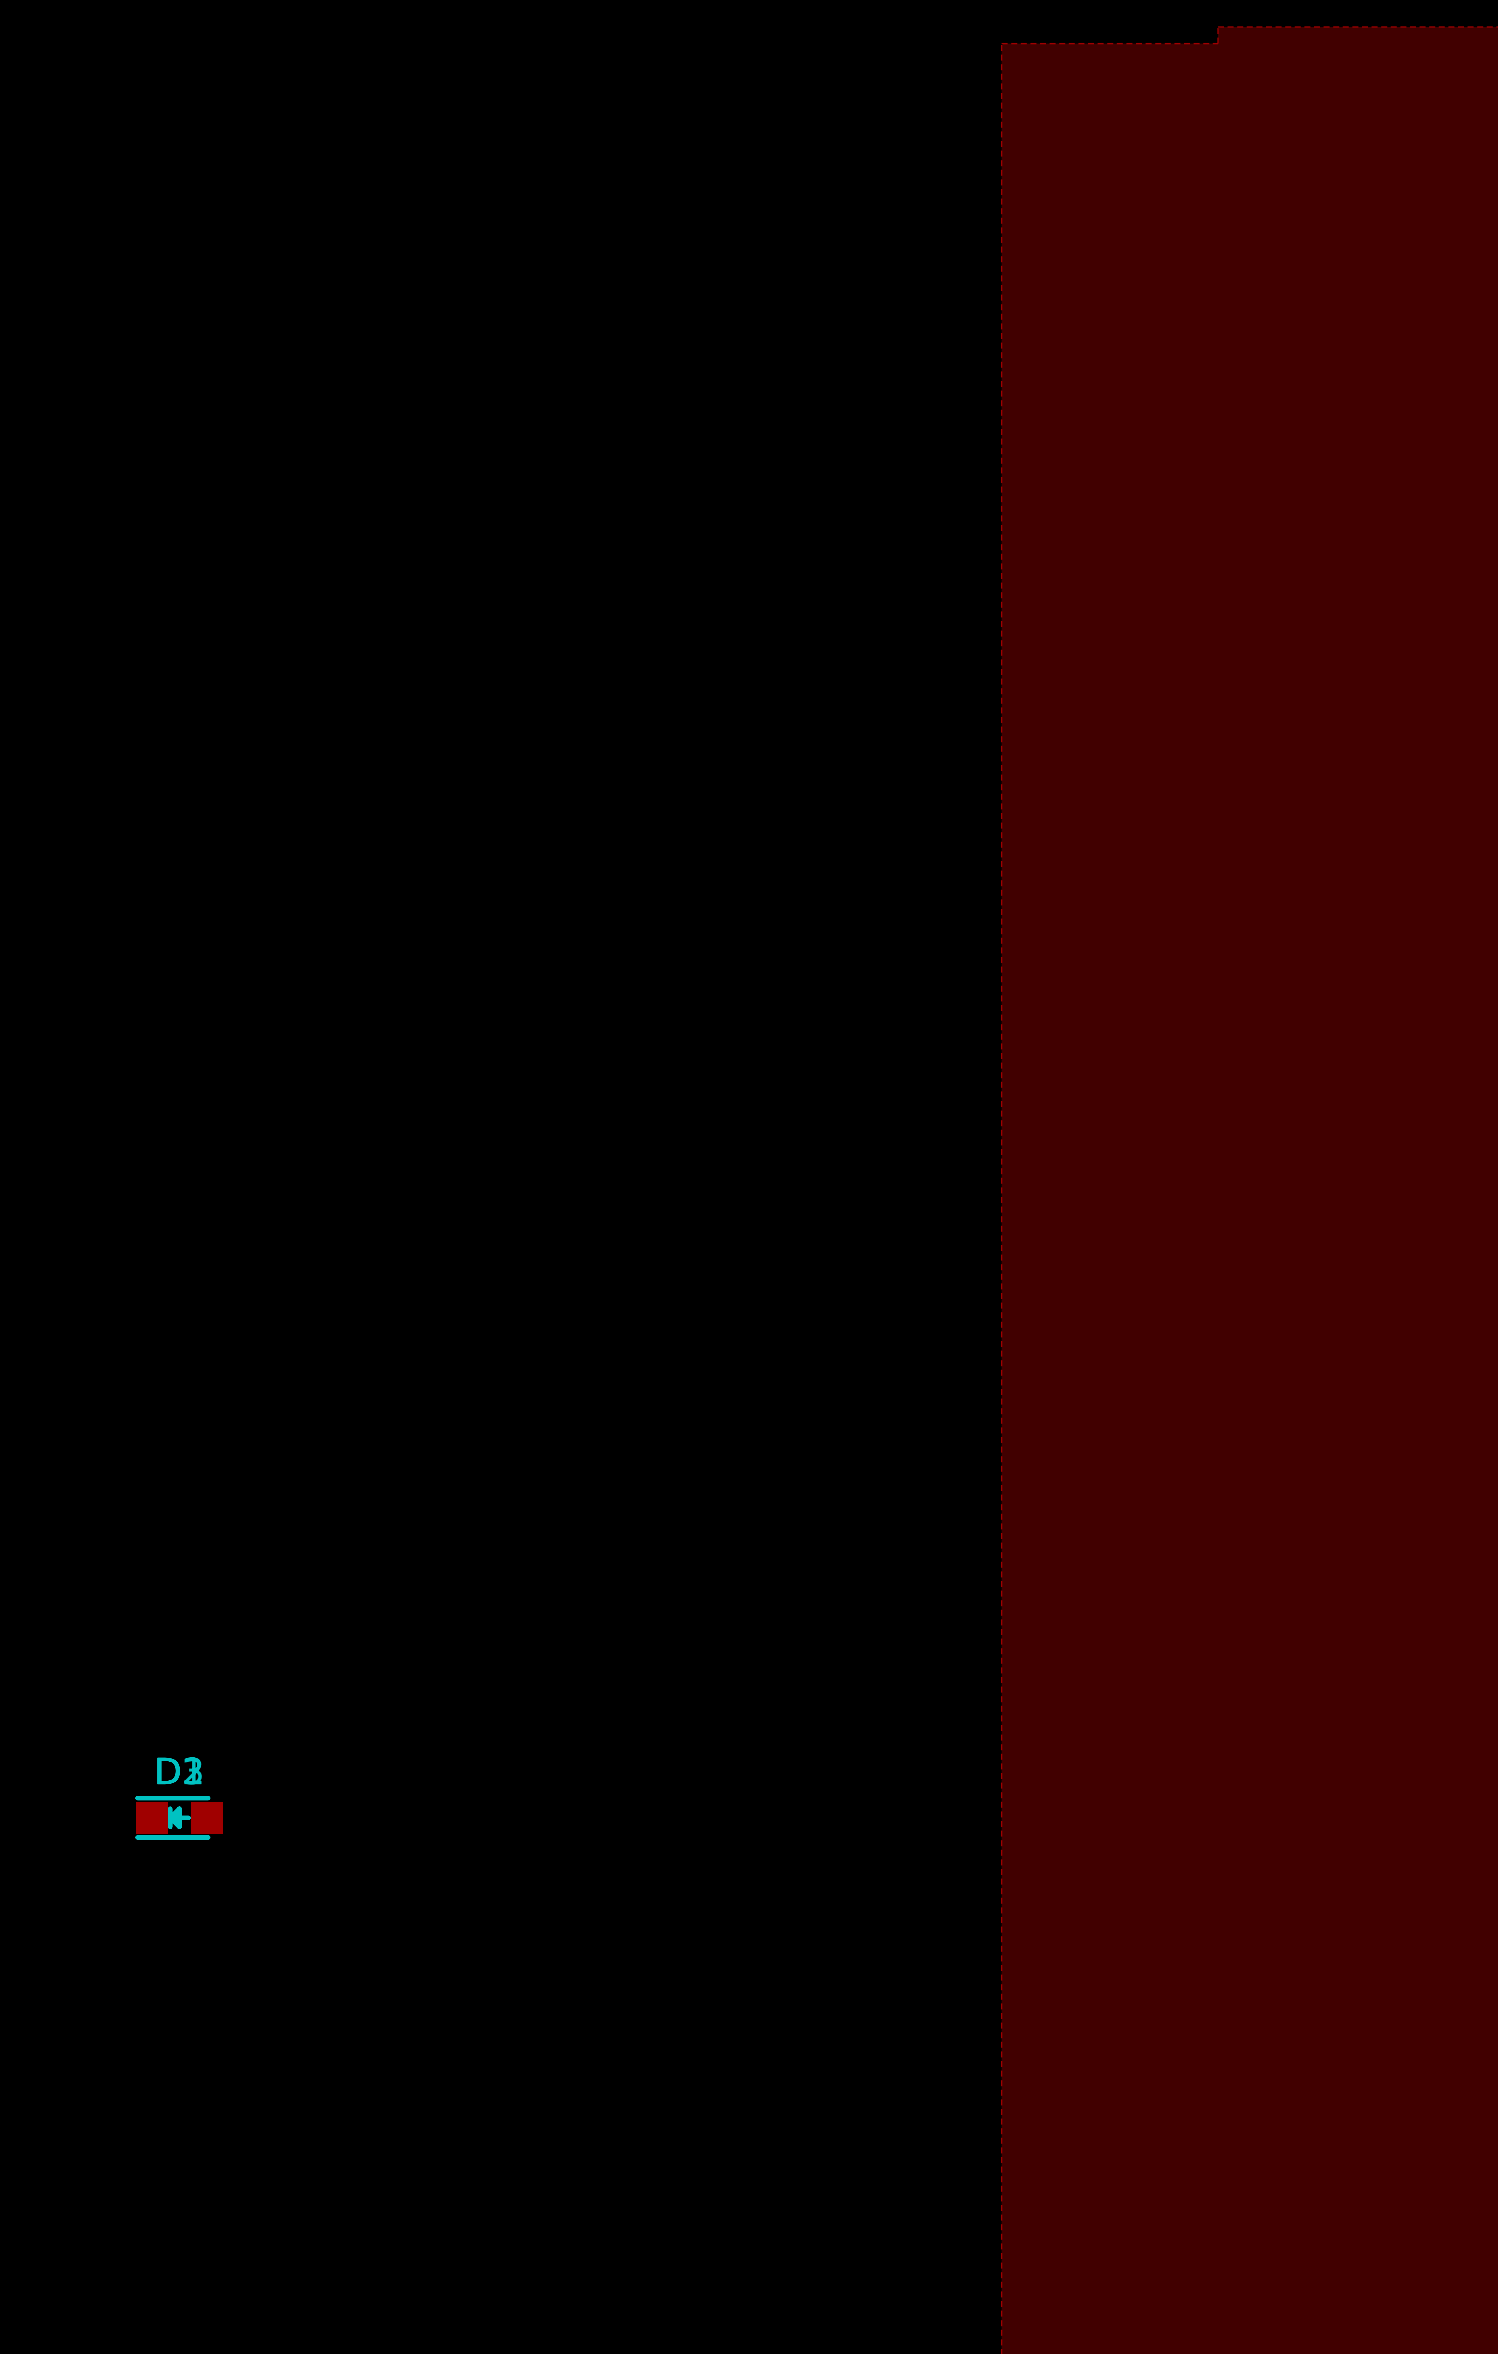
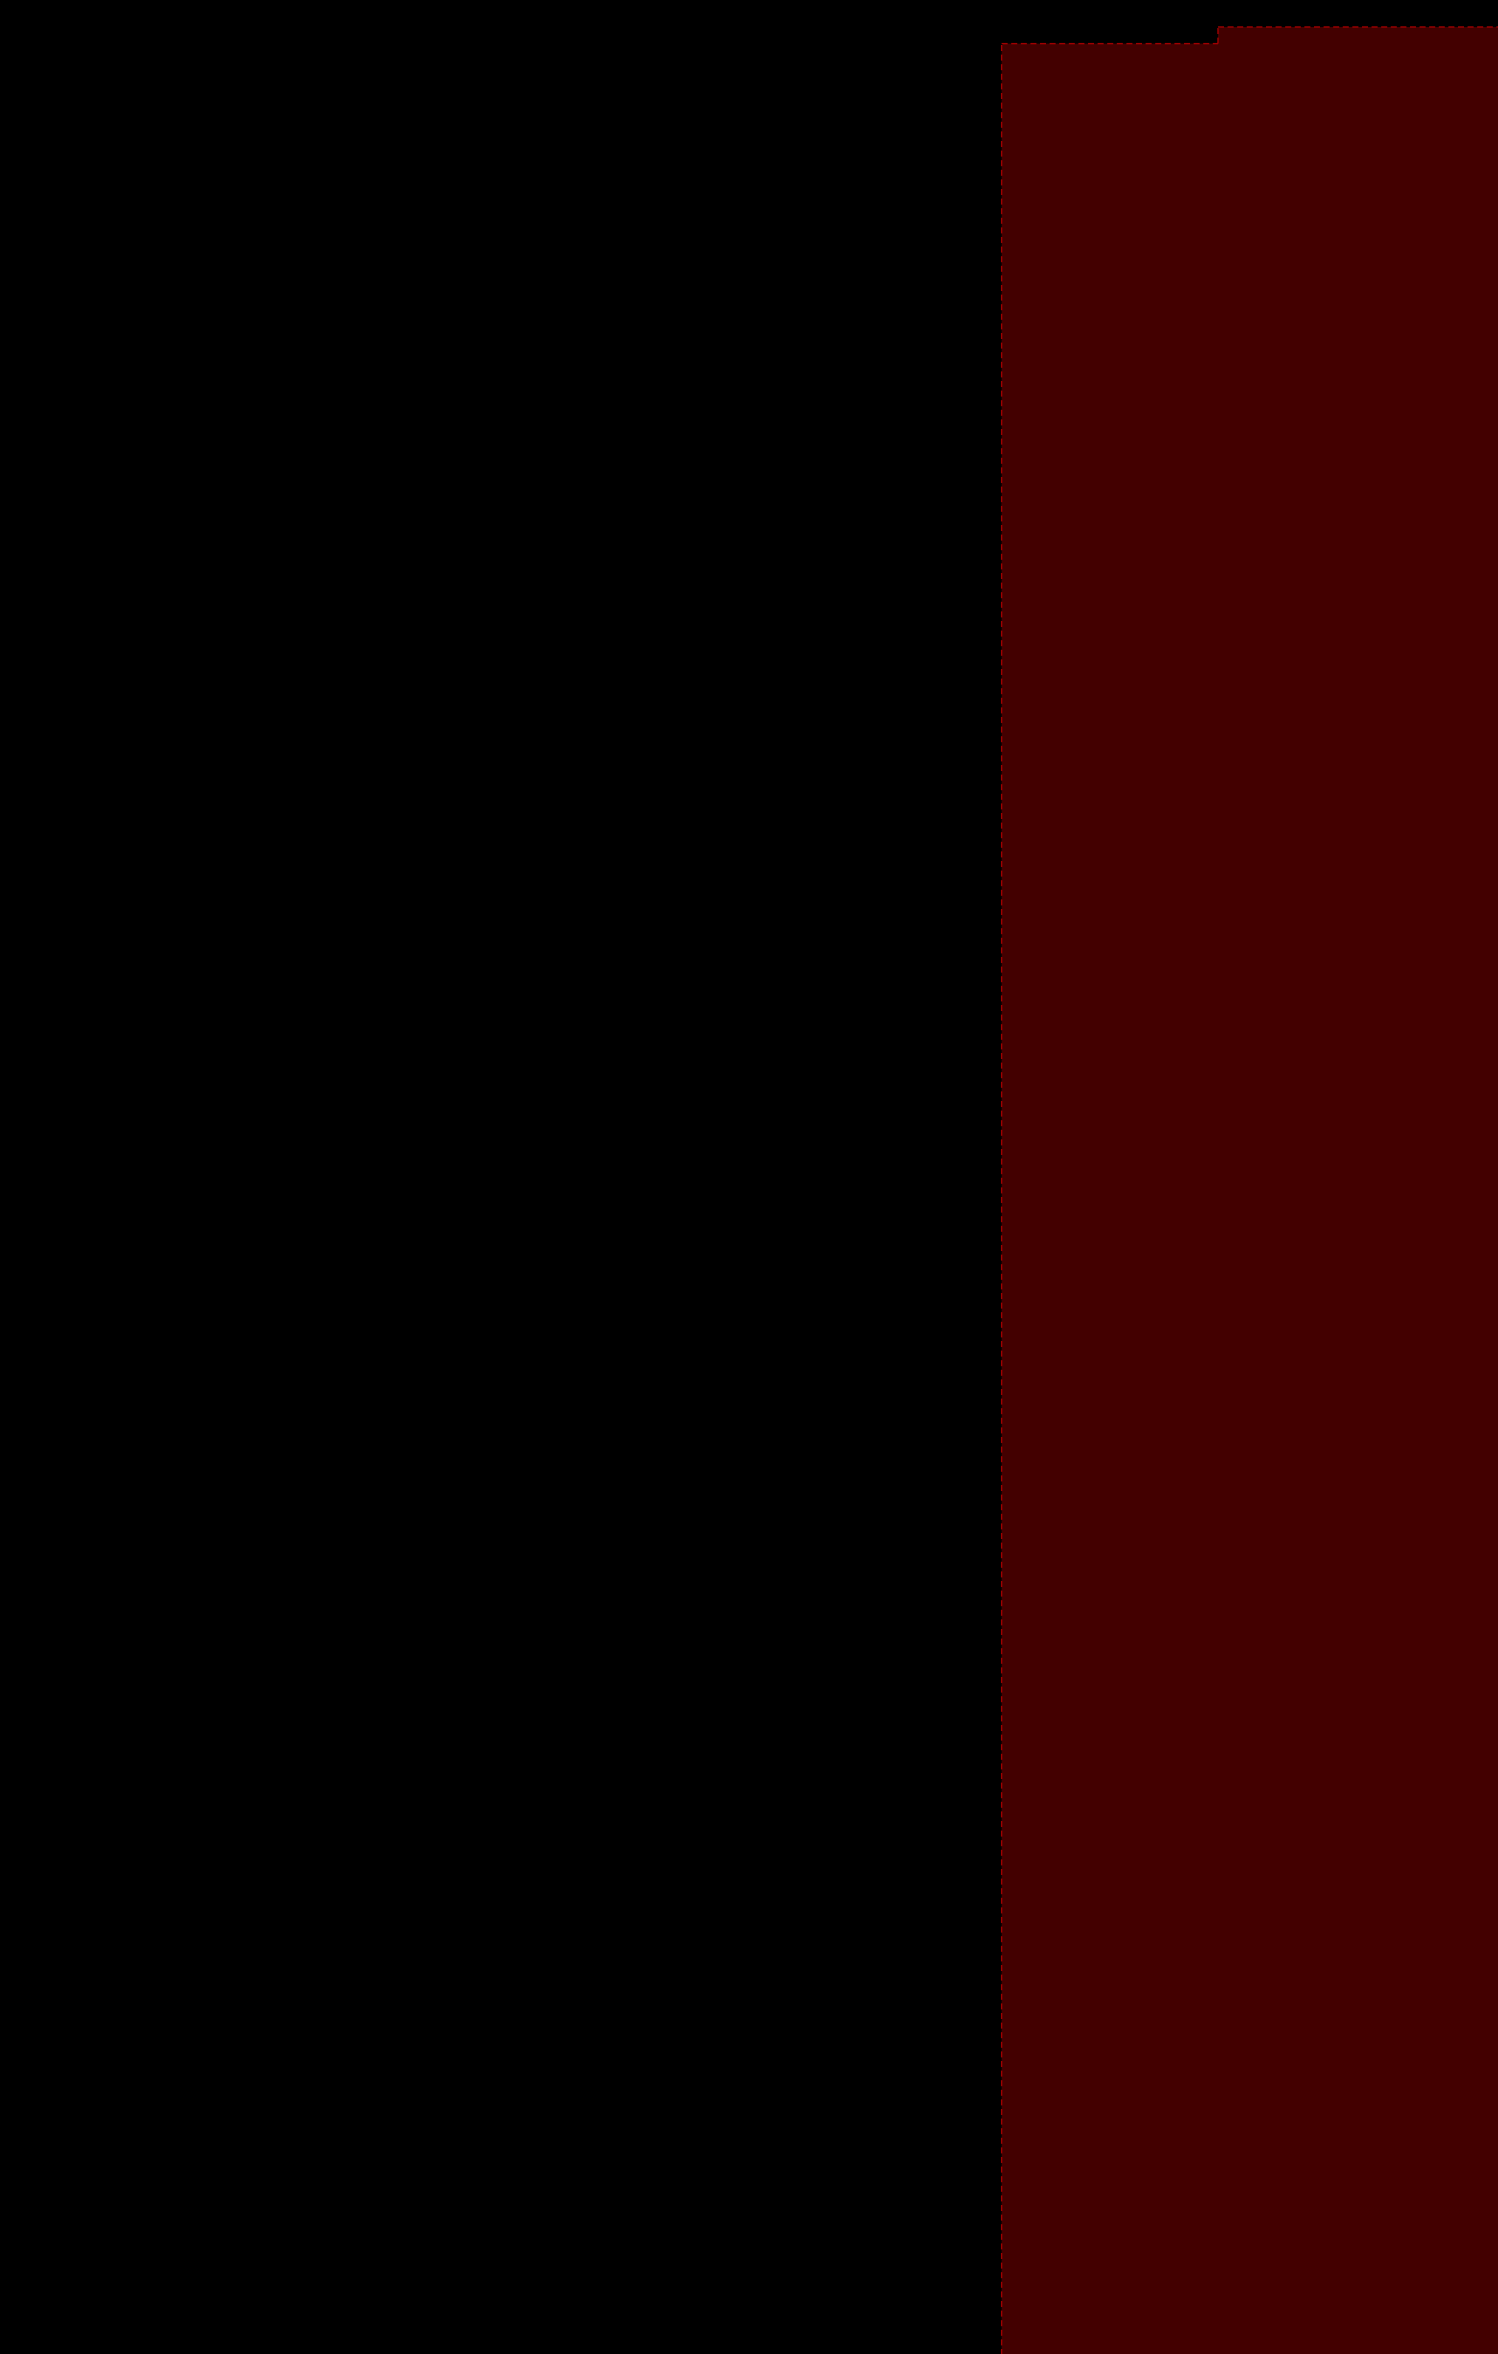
part: (179, 1817) -> none
part: (179, 1817) -> none
part: (179, 1817) -> none

